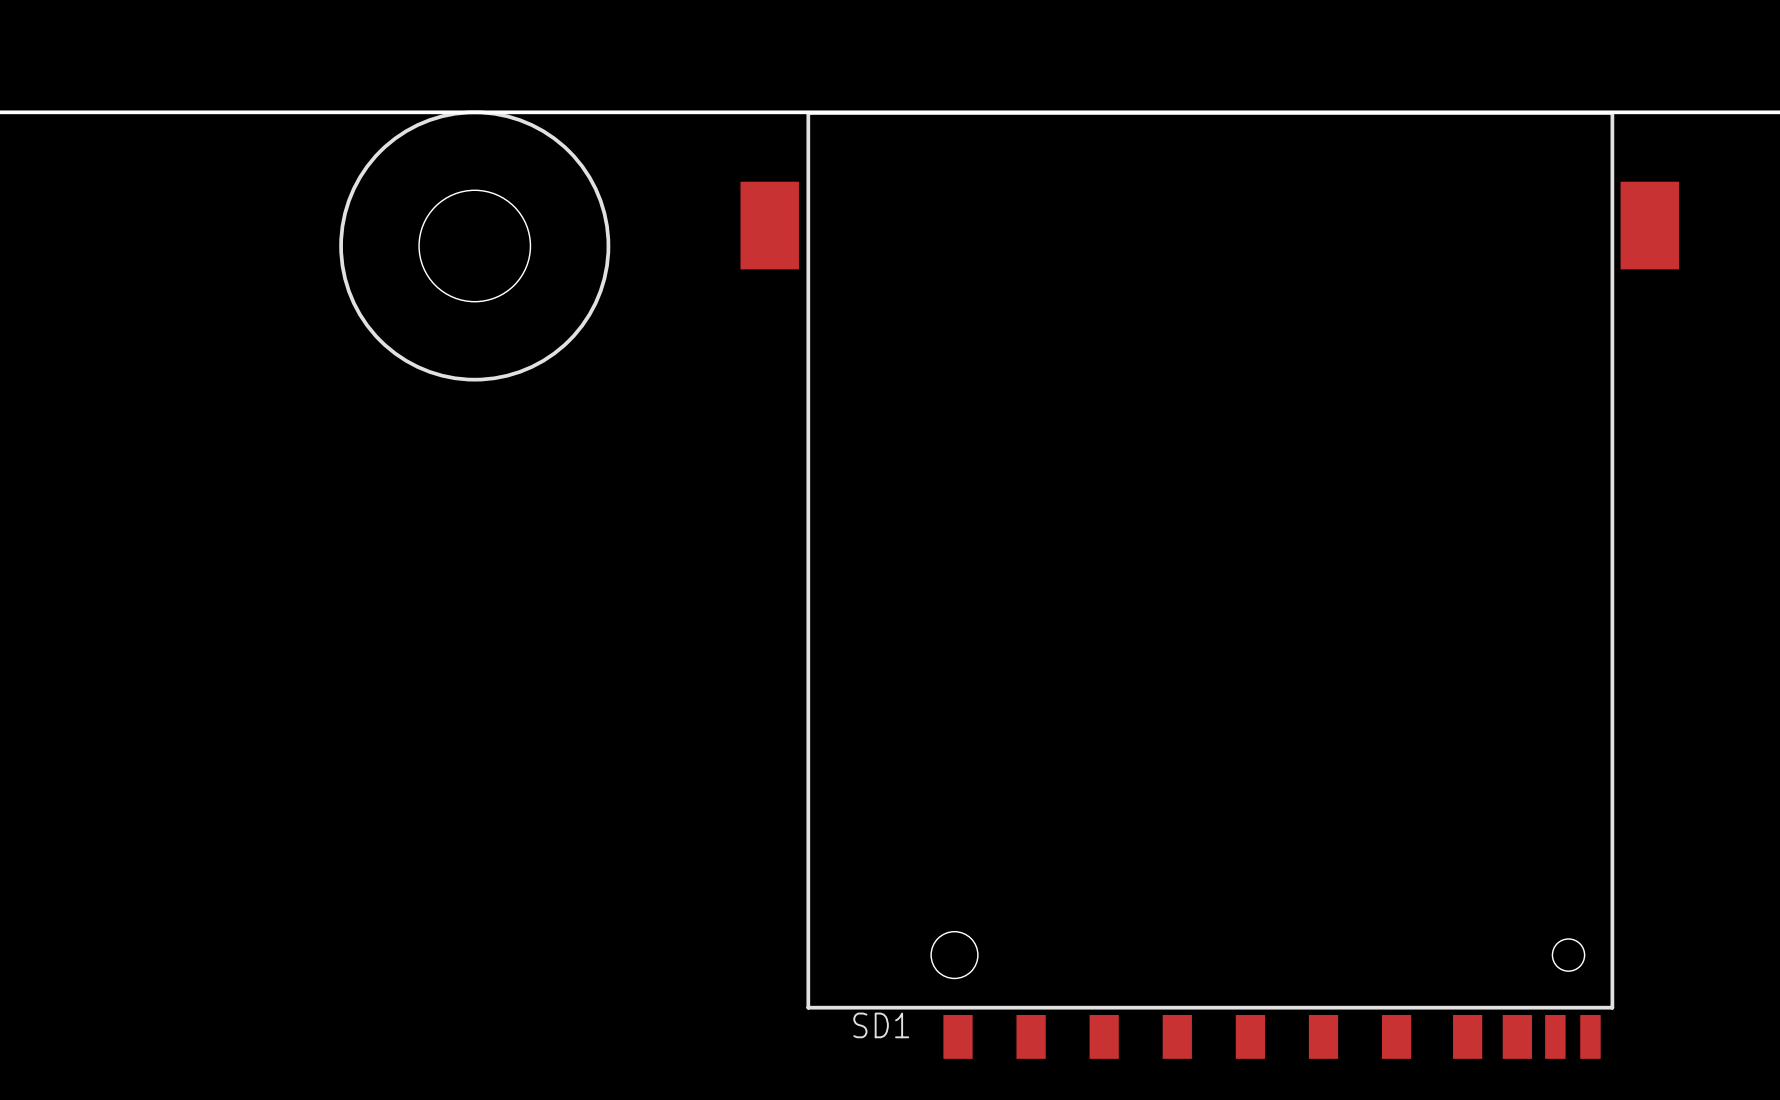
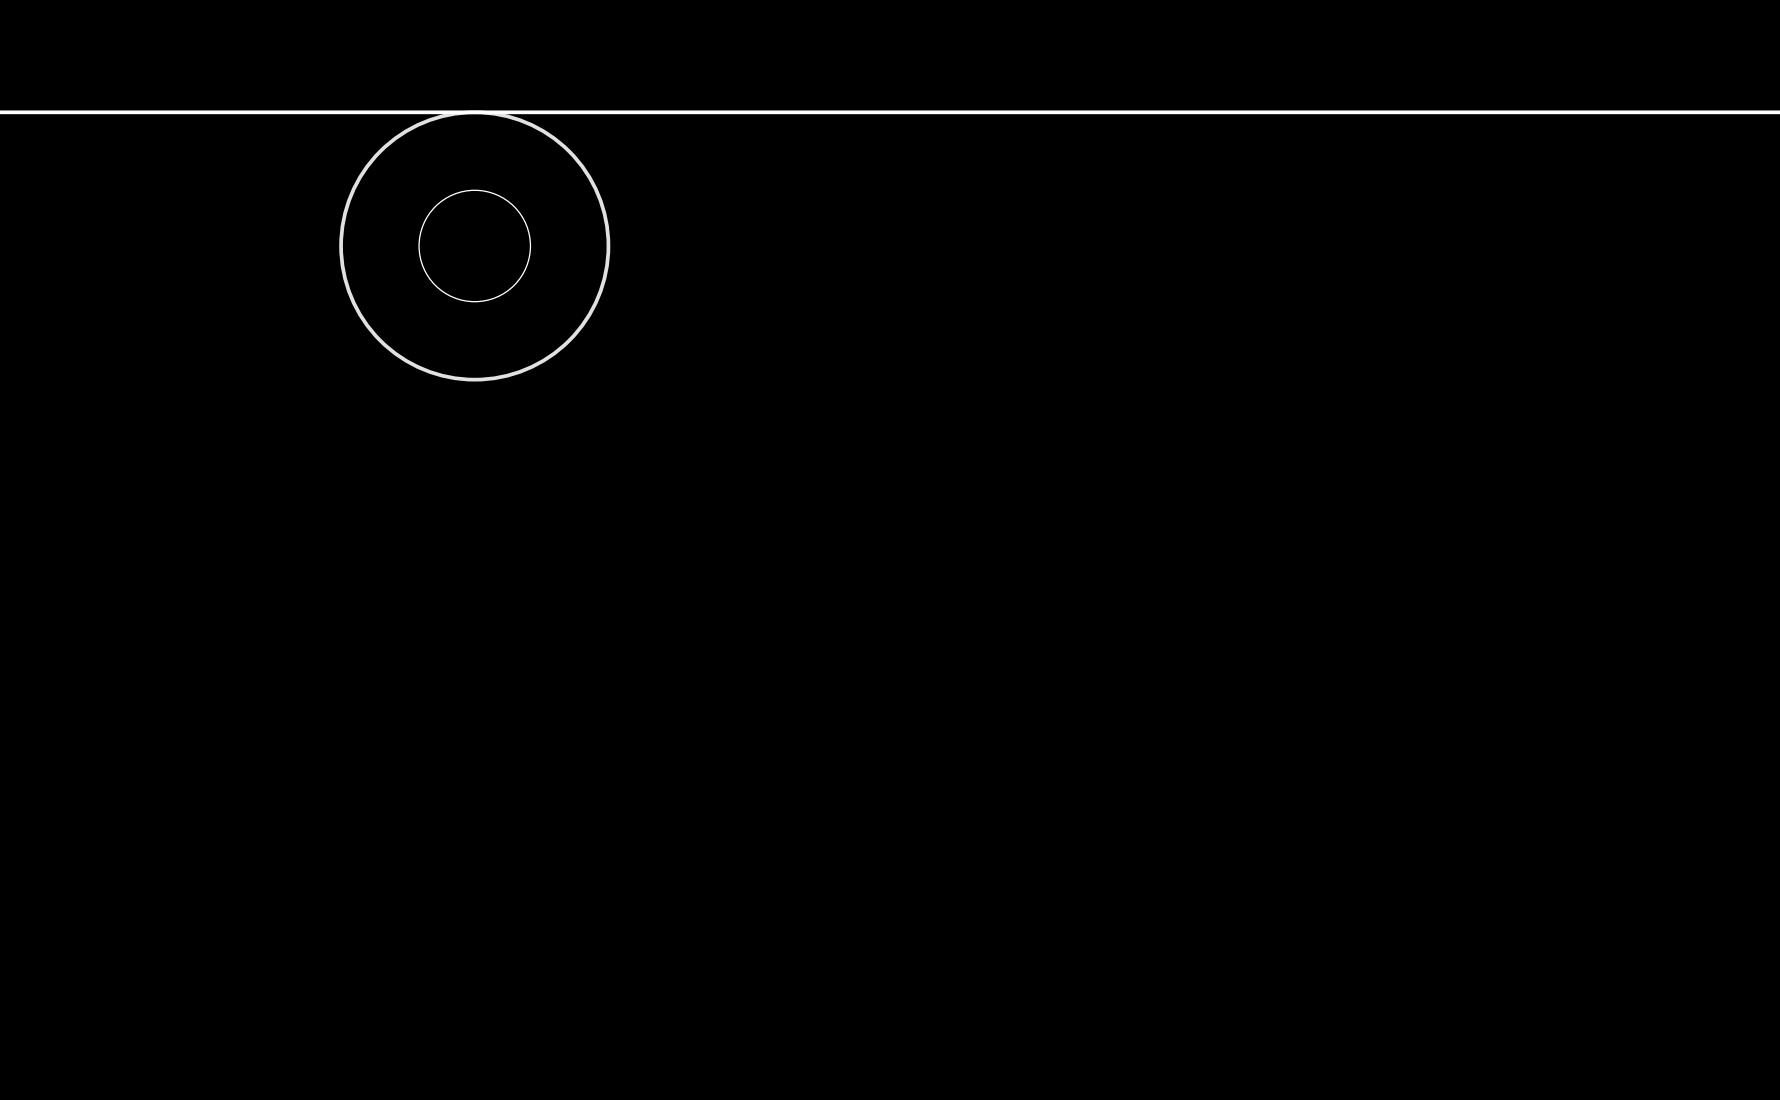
SD1: (1209, 584) -> none

